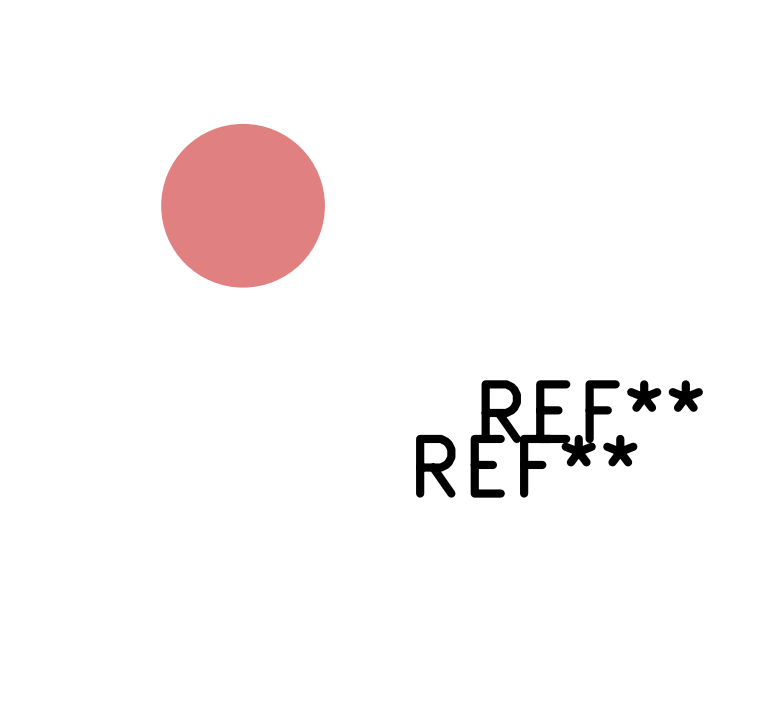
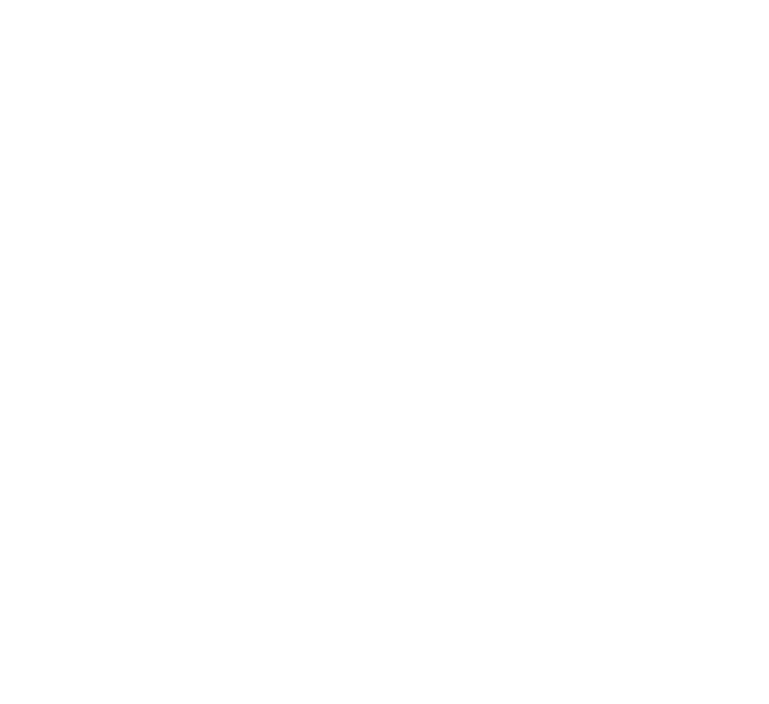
REF**: (243, 205) -> none
REF**: (526, 466) -> none

